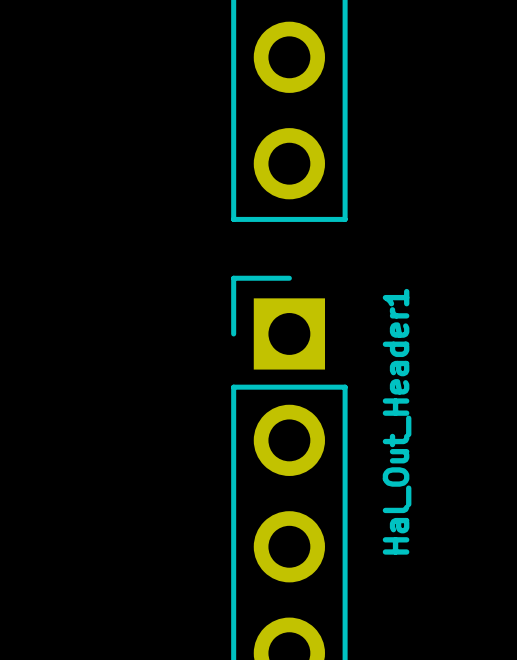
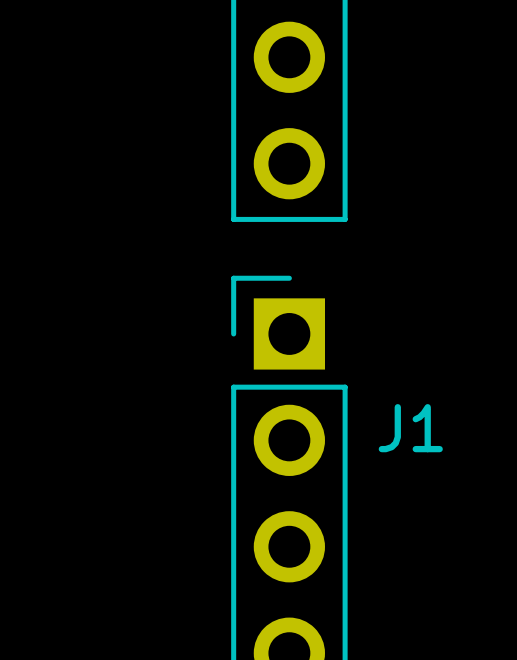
Hal_Out_Header1 name: Hal_Out_Header1 (397, 421) -> J1 (410, 428)

